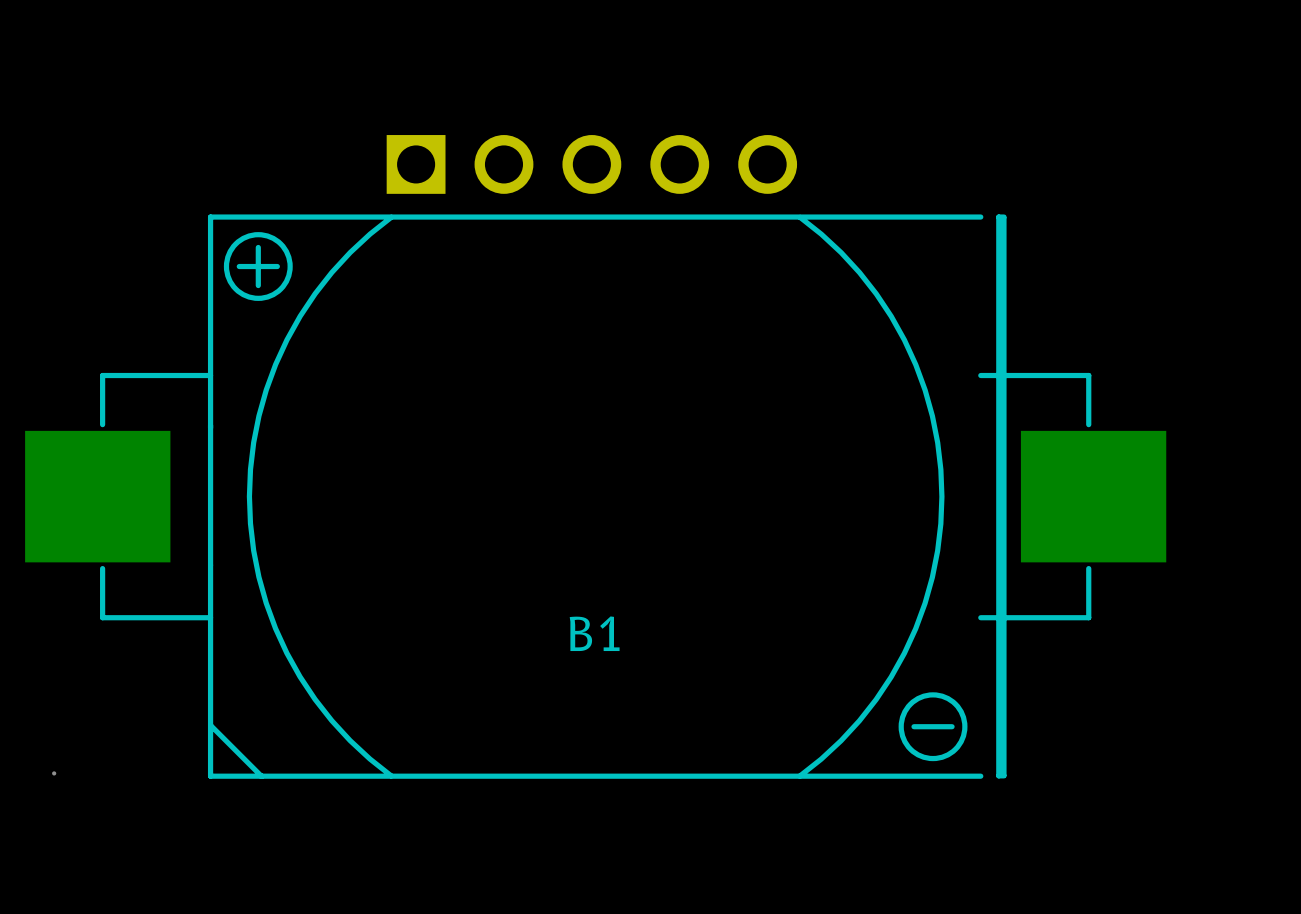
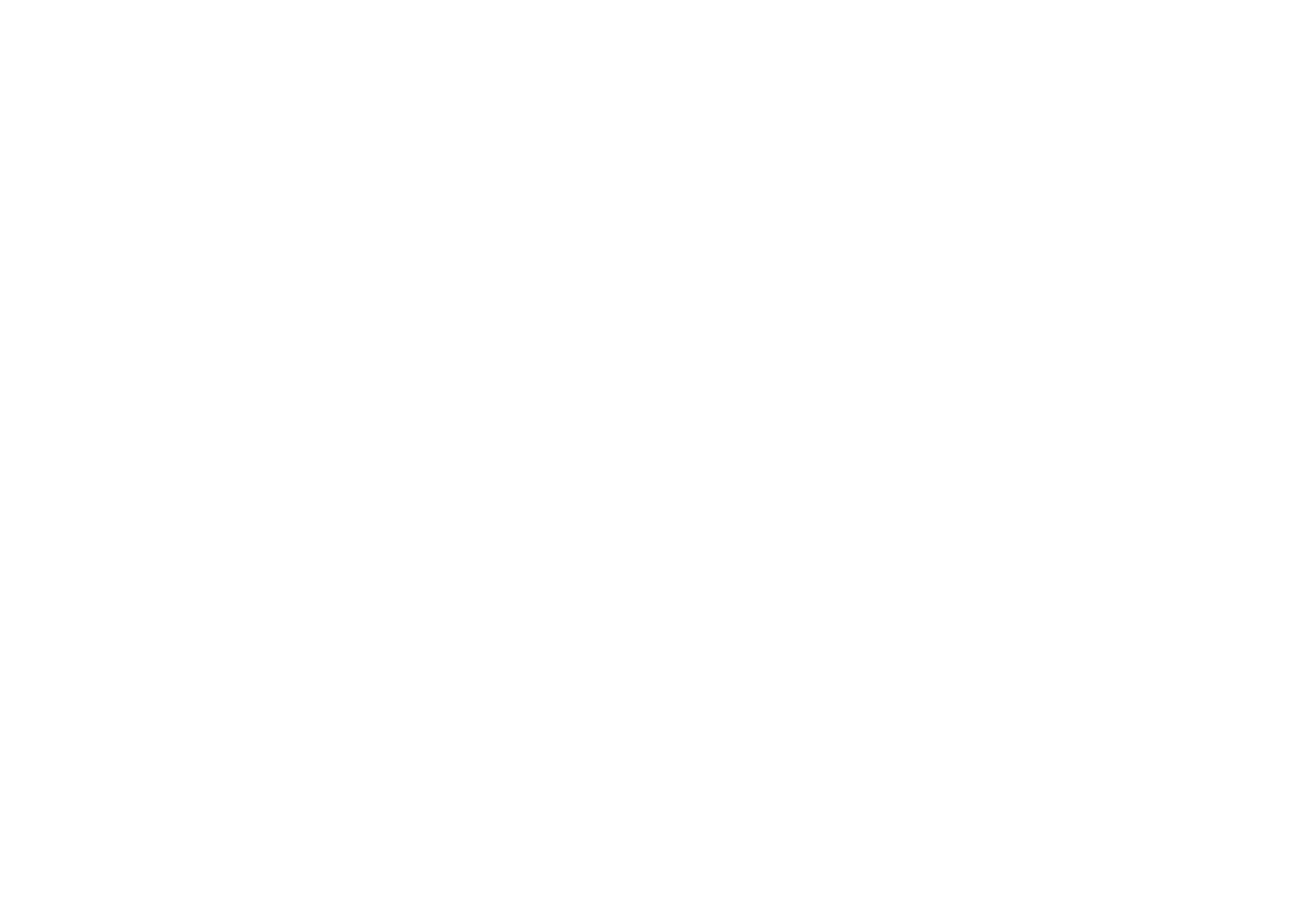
part: (591, 164) -> none
B1: (595, 496) -> none

